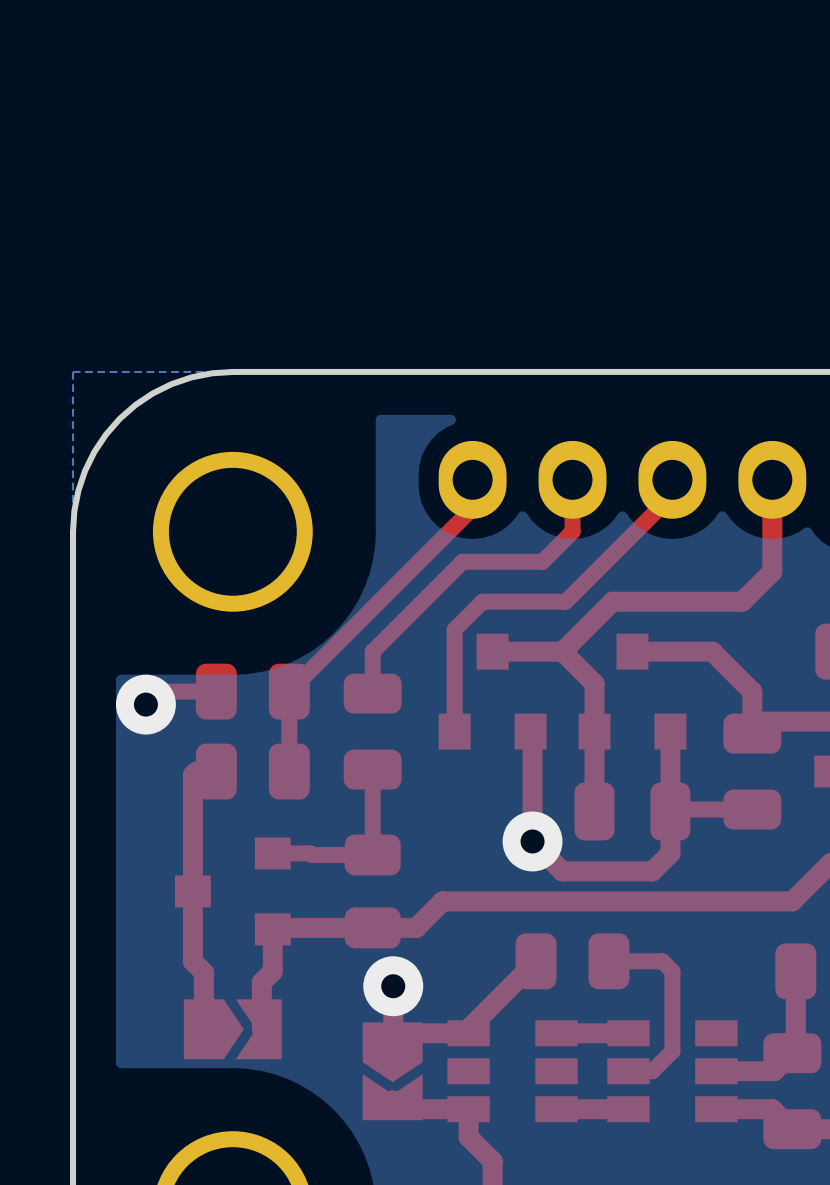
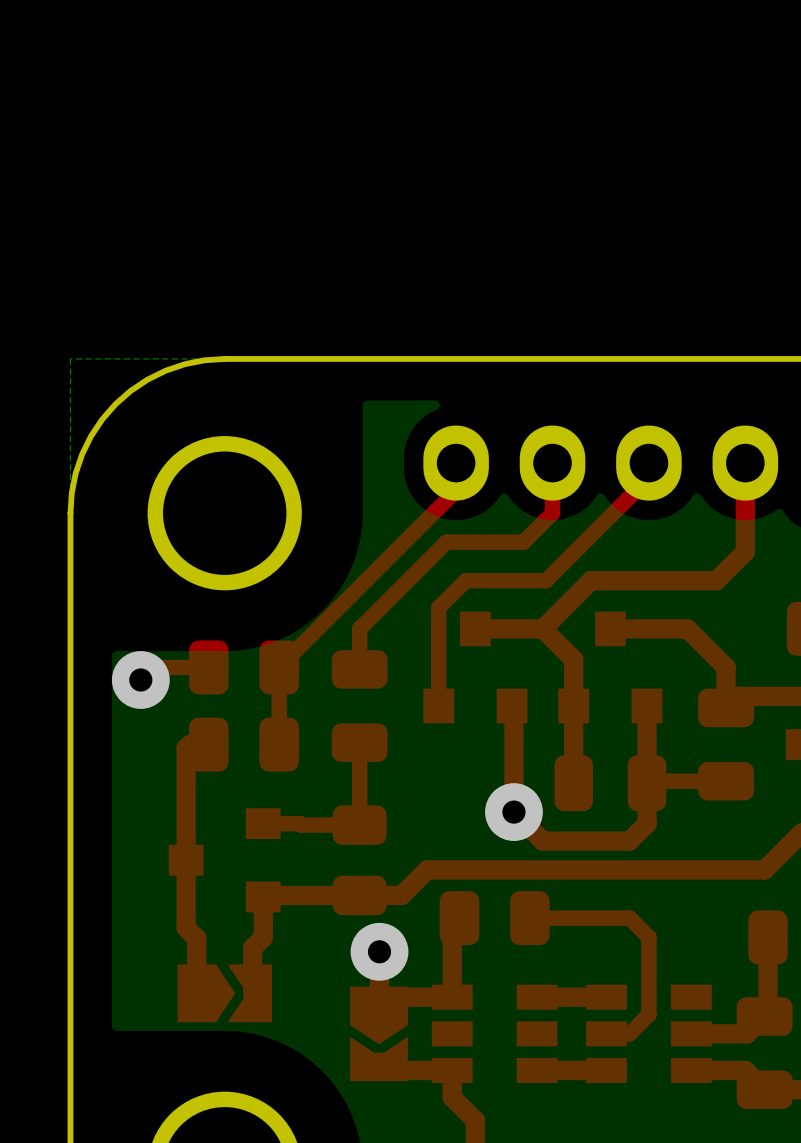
top track: (536, 961) (468, 1028) -> (459, 918) (452, 925) (452, 992)
part position: (572, 961) -> (494, 918)
top track: (662, 961) (608, 961) -> (639, 927) (629, 918) (529, 918)

